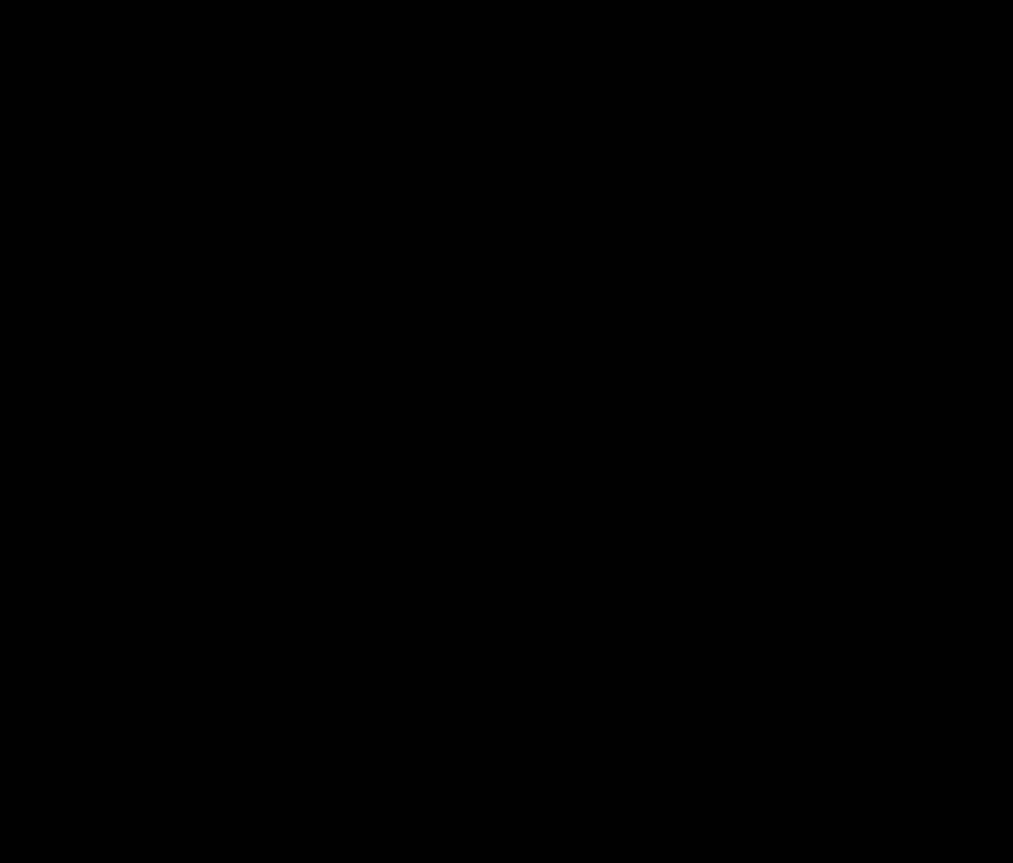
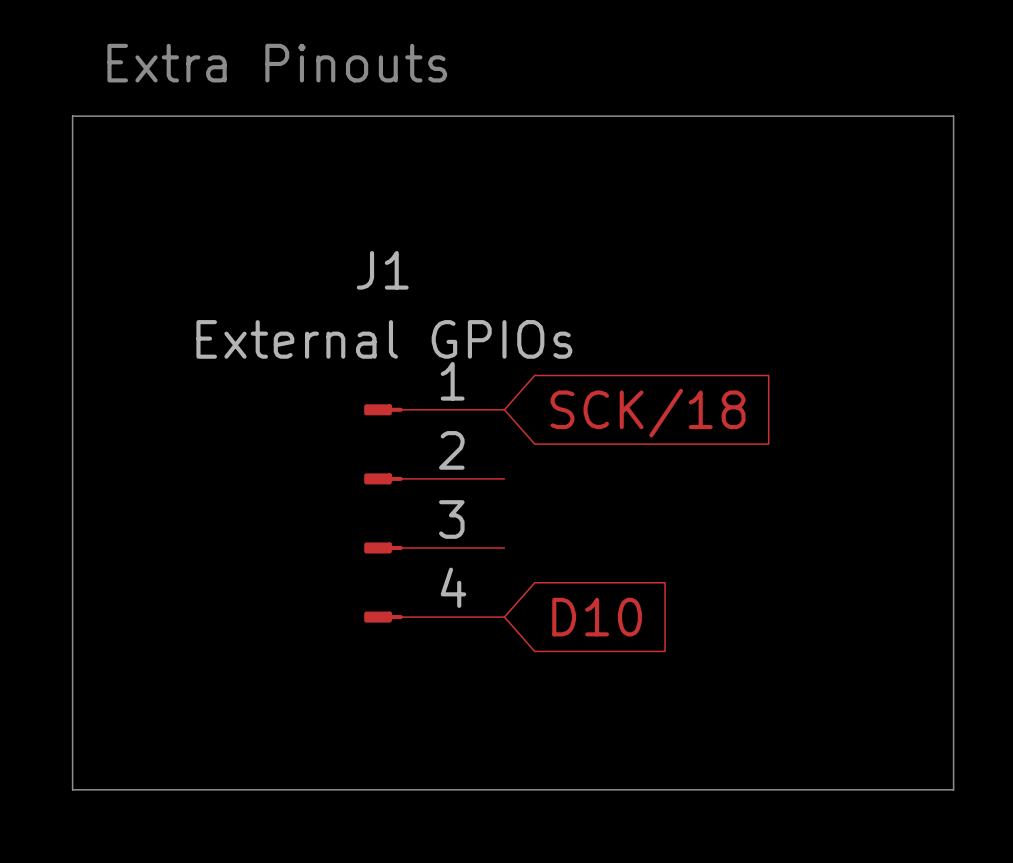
text: none -> Extra Pinouts (277, 63)
line: none -> (72, 116) (953, 116) (953, 789) (72, 789) (72, 116)
global label: none -> SCK/18 (648, 413)
J1: none -> External GPIOs (434, 513)
global label: none -> D10 (597, 617)

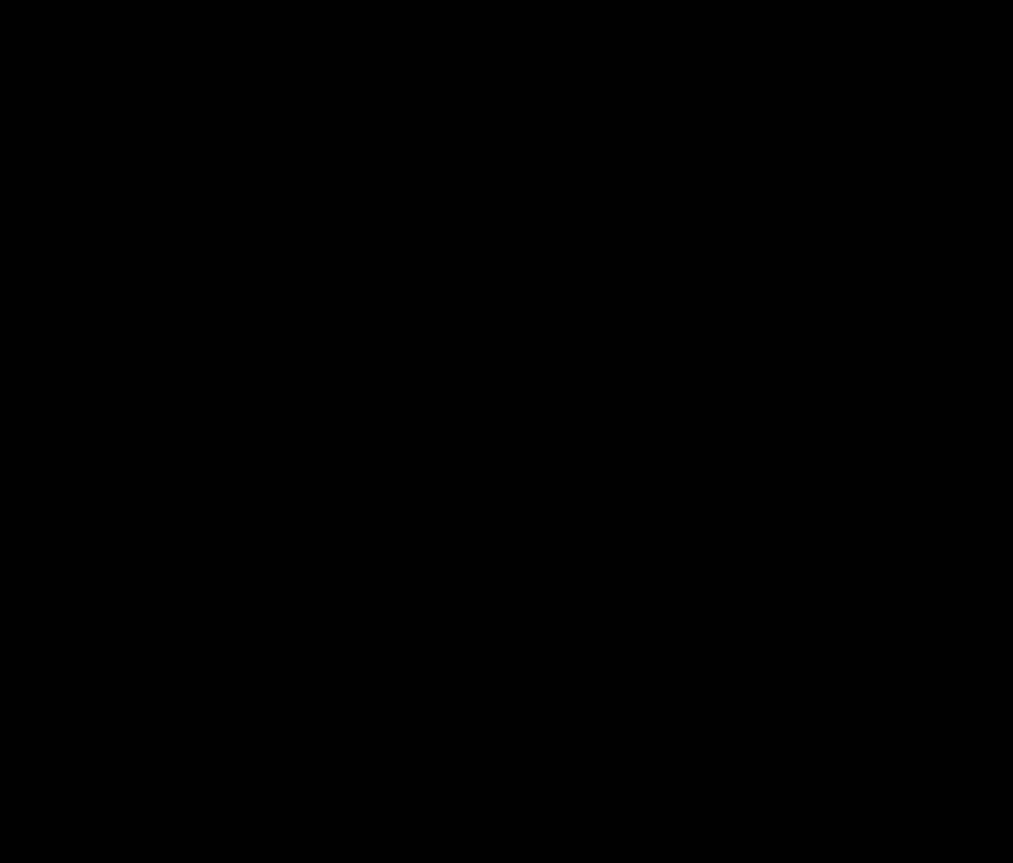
text: Extra Pinouts (277, 63) -> none
line: (72, 116) (953, 116) (953, 789) (72, 789) (72, 116) -> none
global label: SCK/18 (648, 413) -> none
J1: External GPIOs (434, 513) -> none
global label: D10 (597, 617) -> none

